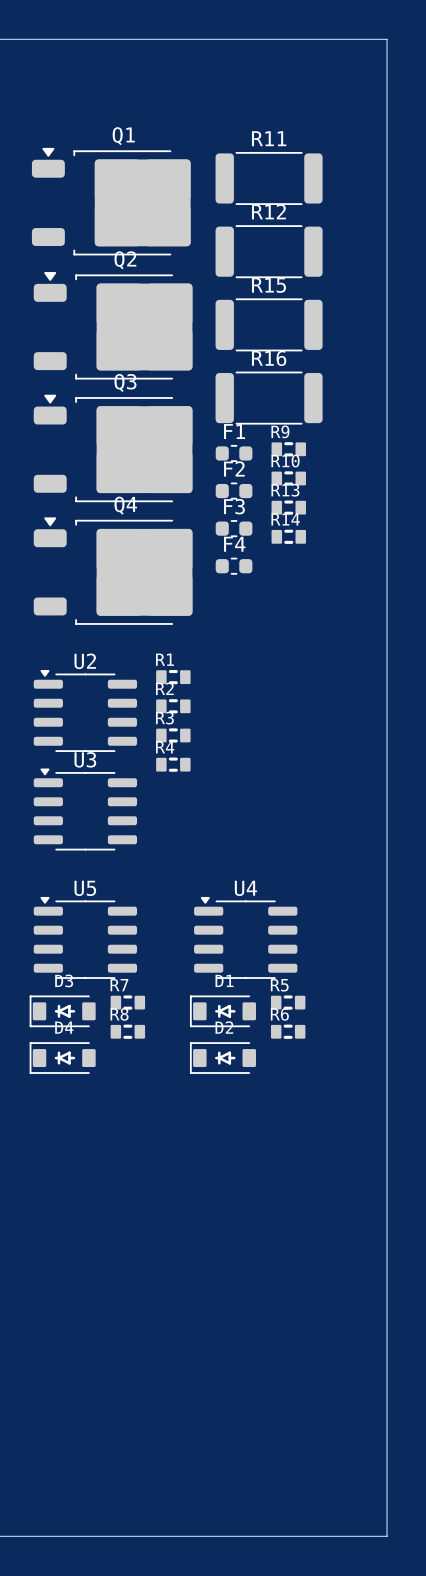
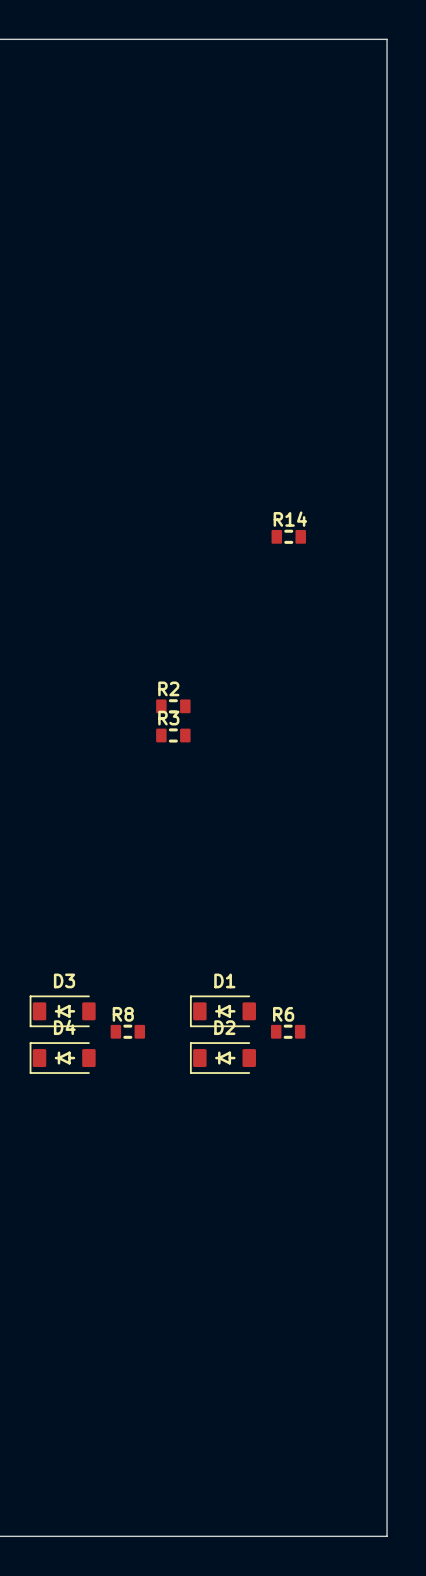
R11: (269, 178) -> none
Q1: (111, 201) -> none
R12: (269, 251) -> none
R15: (269, 324) -> none
Q2: (113, 325) -> none
R16: (269, 398) -> none
Q3: (113, 448) -> none
R9: (288, 449) -> none
F1: (234, 453) -> none
R10: (288, 478) -> none
F2: (234, 491) -> none
R13: (288, 507) -> none
F3: (234, 528) -> none
F4: (234, 566) -> none
Q4: (113, 571) -> none
R1: (173, 677) -> none
U2: (85, 710) -> none
R4: (173, 764) -> none
U3: (85, 809) -> none
U5: (85, 937) -> none
U4: (245, 937) -> none
R7: (127, 1002) -> none
R5: (288, 1002) -> none

